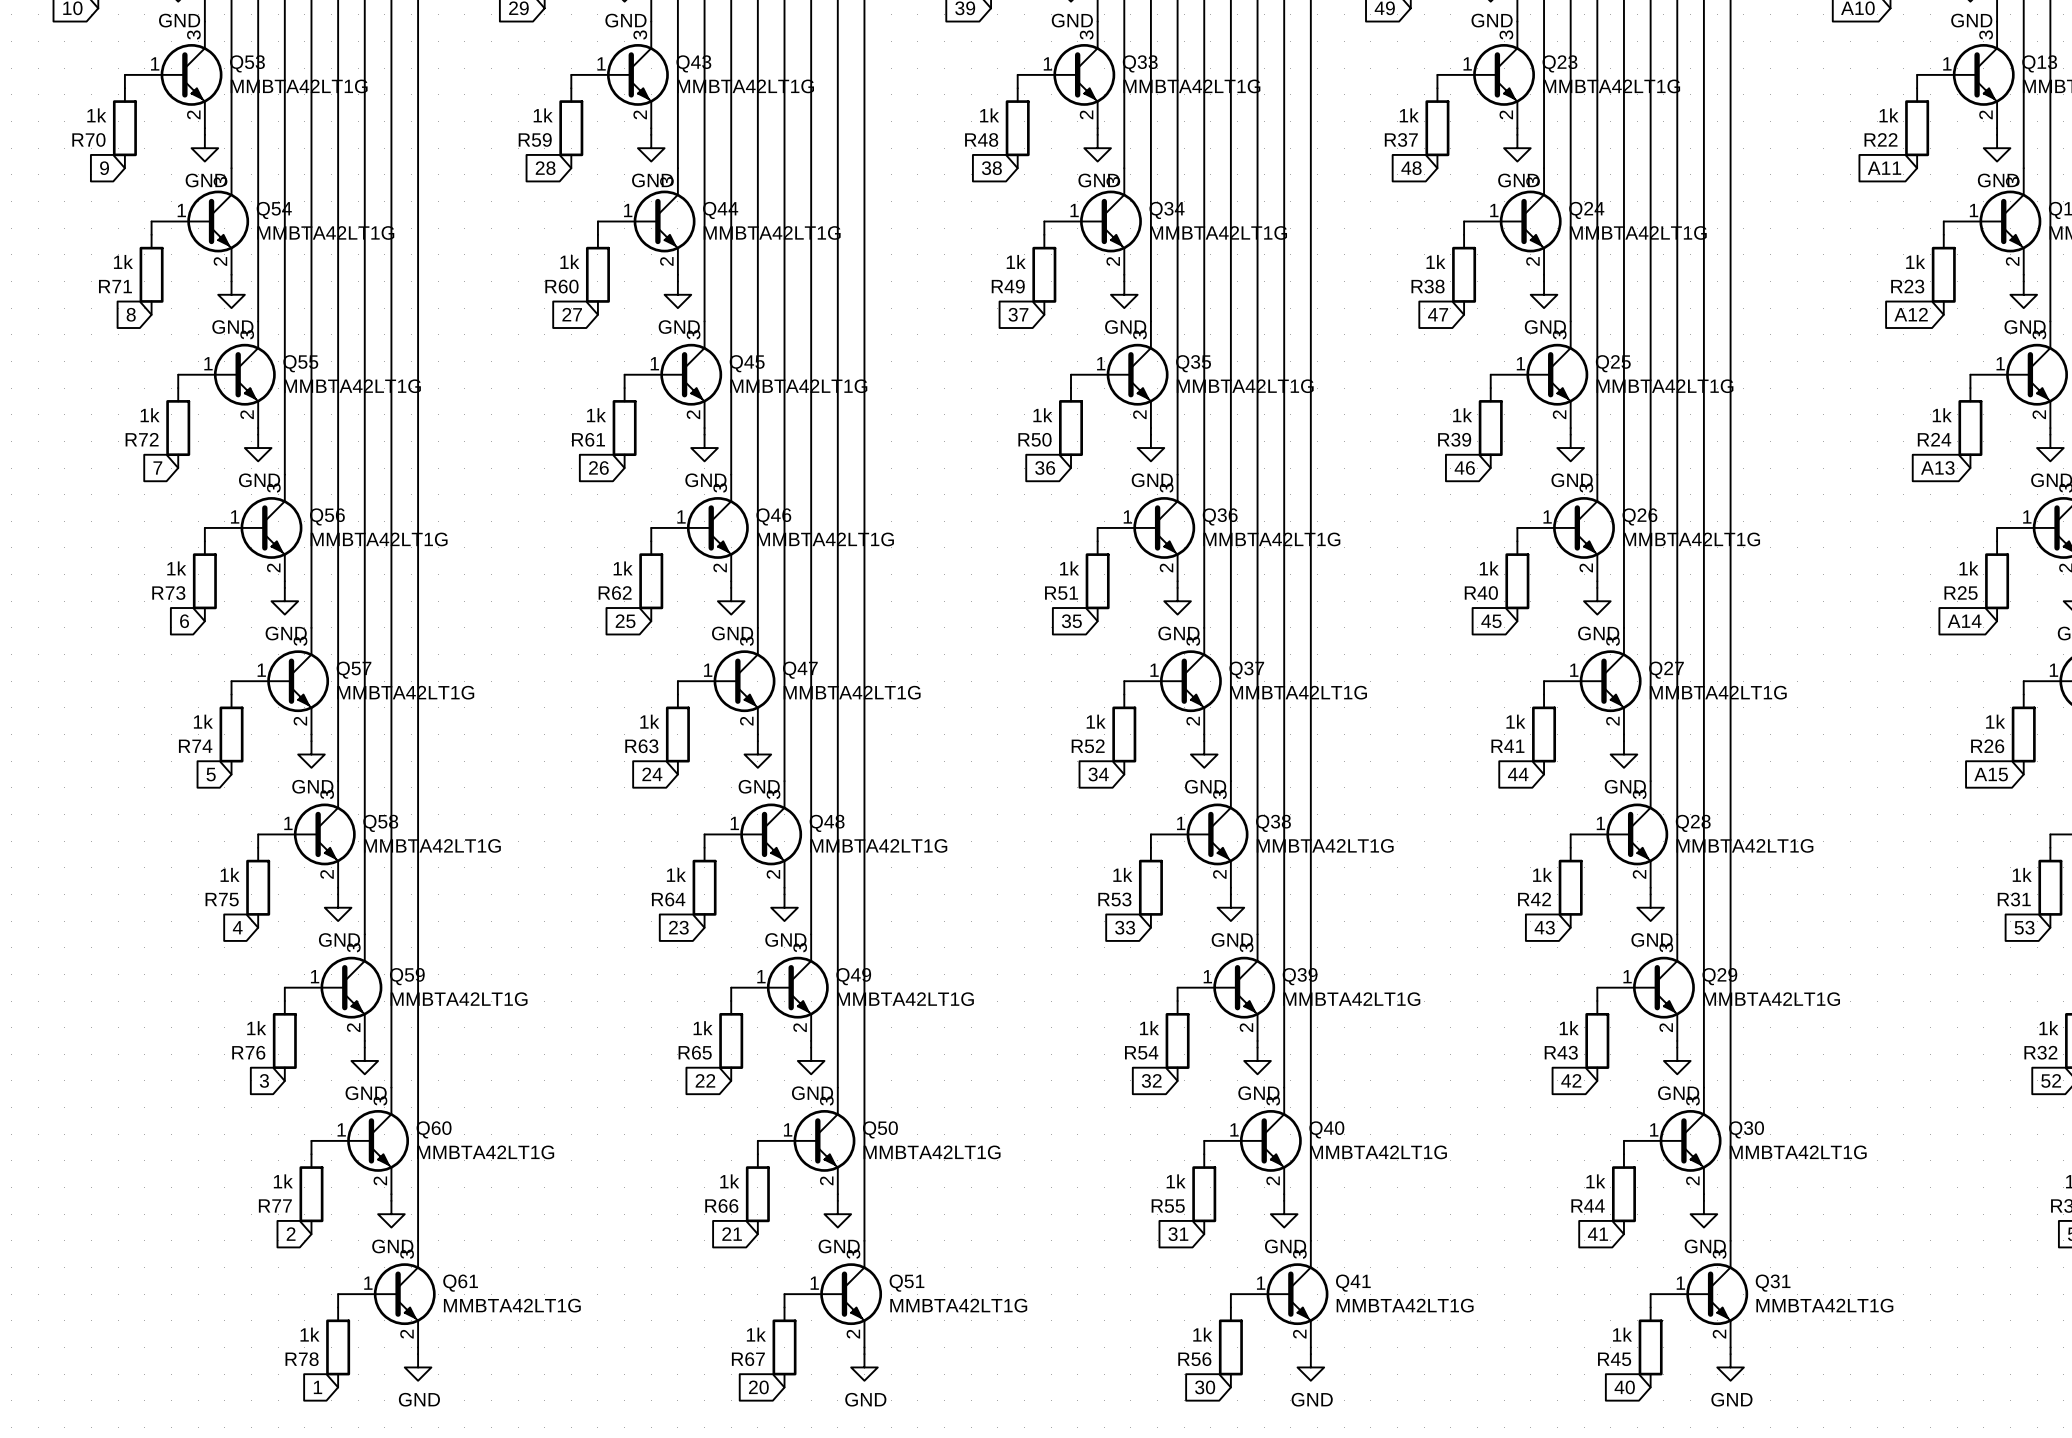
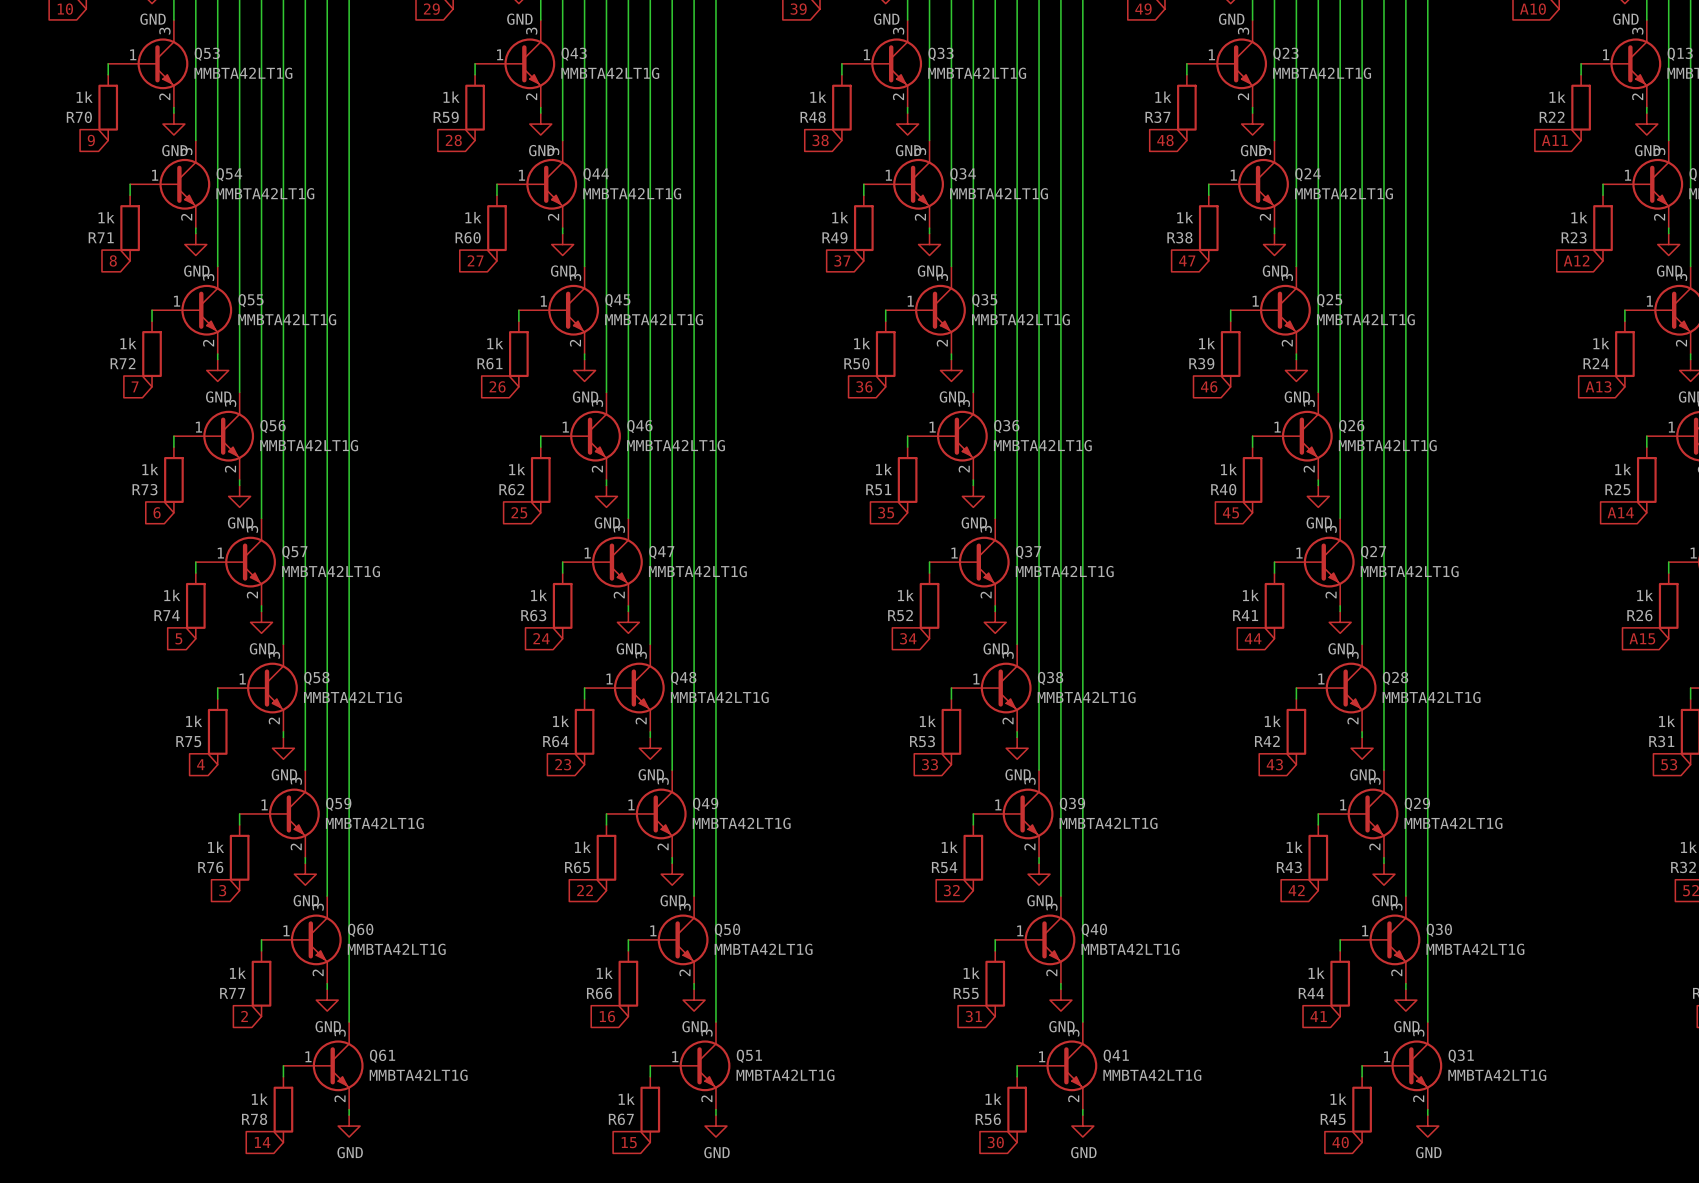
global label: 21 (732, 1234) -> 16 (607, 1016)
global label: 1 (318, 1387) -> 14 (262, 1142)
global label: 20 (758, 1387) -> 15 (629, 1142)

